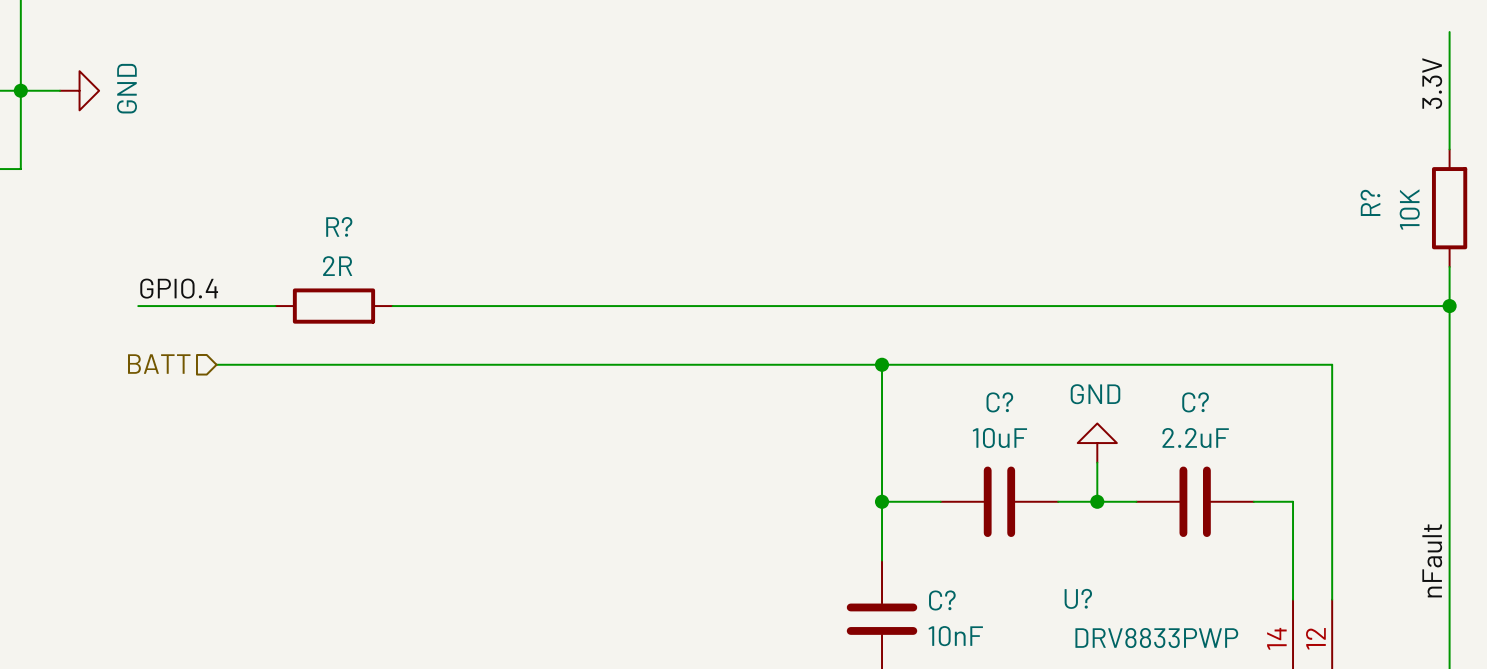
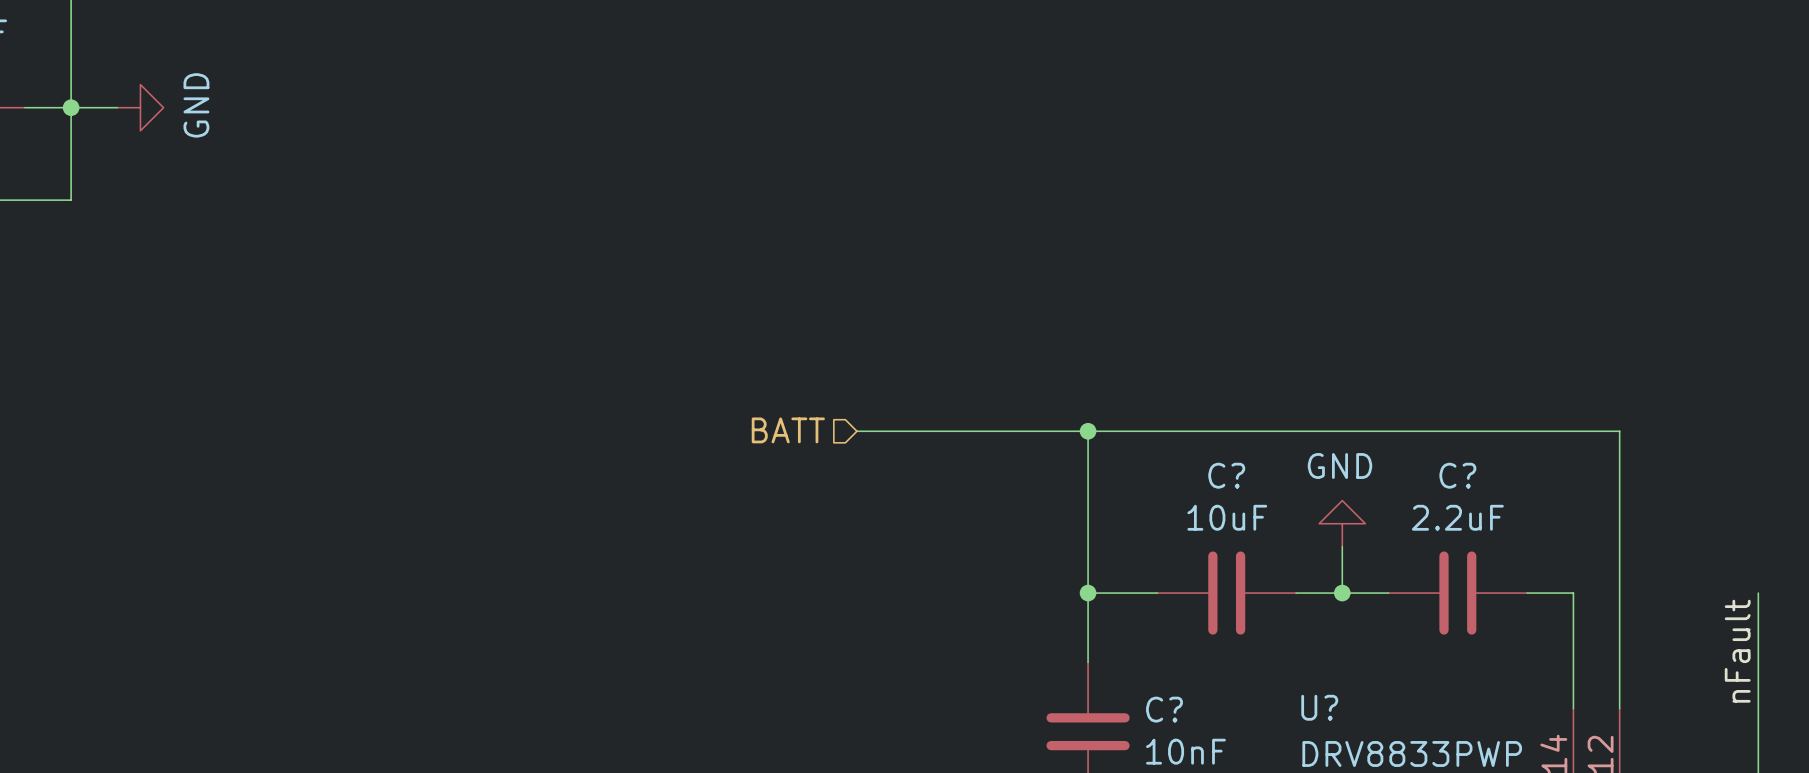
wire: (1449, 32) (1449, 149) -> none
label: 3.3V (1432, 83) -> none
R?: 10K (1449, 208) -> none
wire: (1449, 266) (1449, 501) -> none
label: GPIO.4 (179, 288) -> none
wire: (138, 306) (275, 306) -> none
R?: 2R (333, 306) -> none
wire: (392, 306) (1449, 306) -> none
junction: (1449, 306) -> none
hierarchical label: BATT (159, 364) -> none
wire: (216, 364) (686, 364) -> none
hierarchical label: none -> BATT (788, 430)

